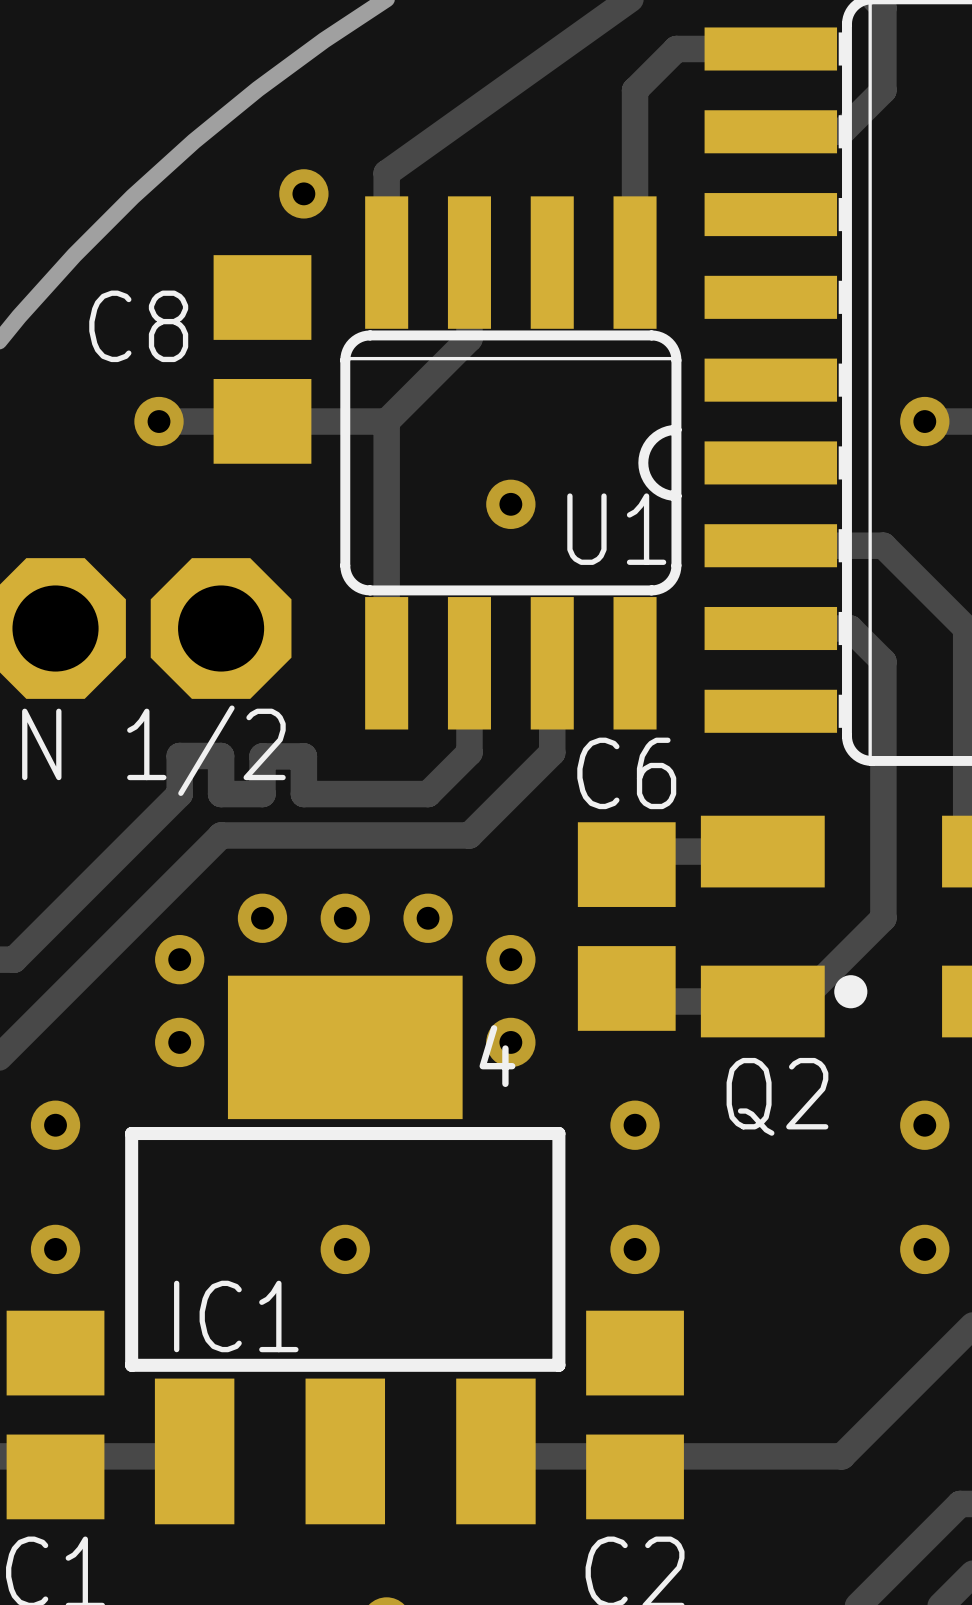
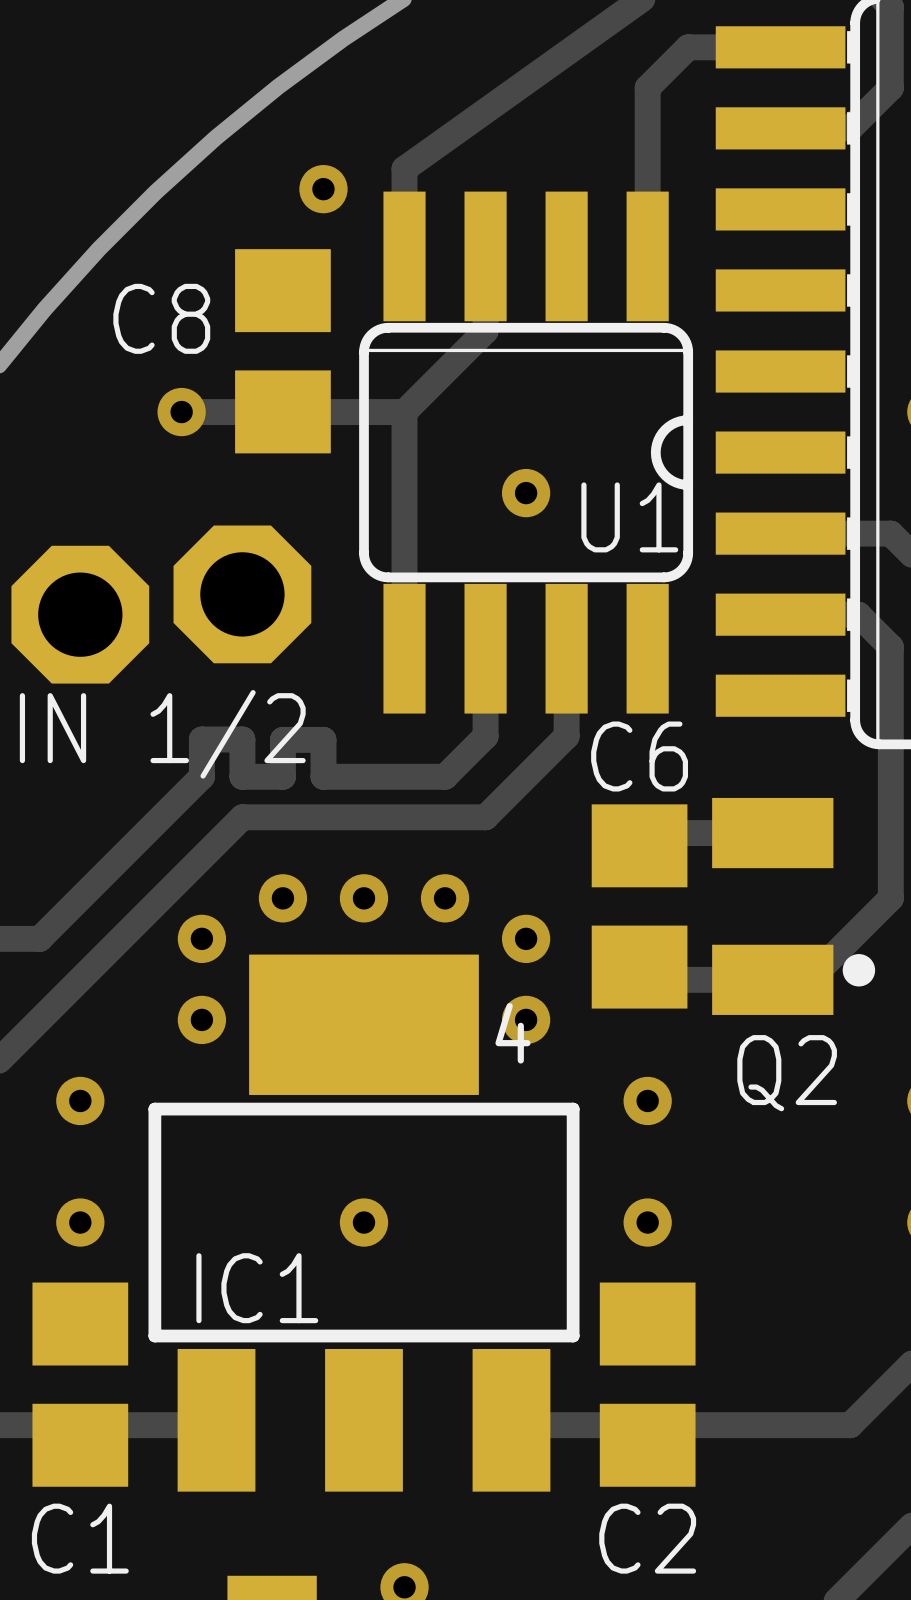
part position: (221, 628) -> (242, 594)

